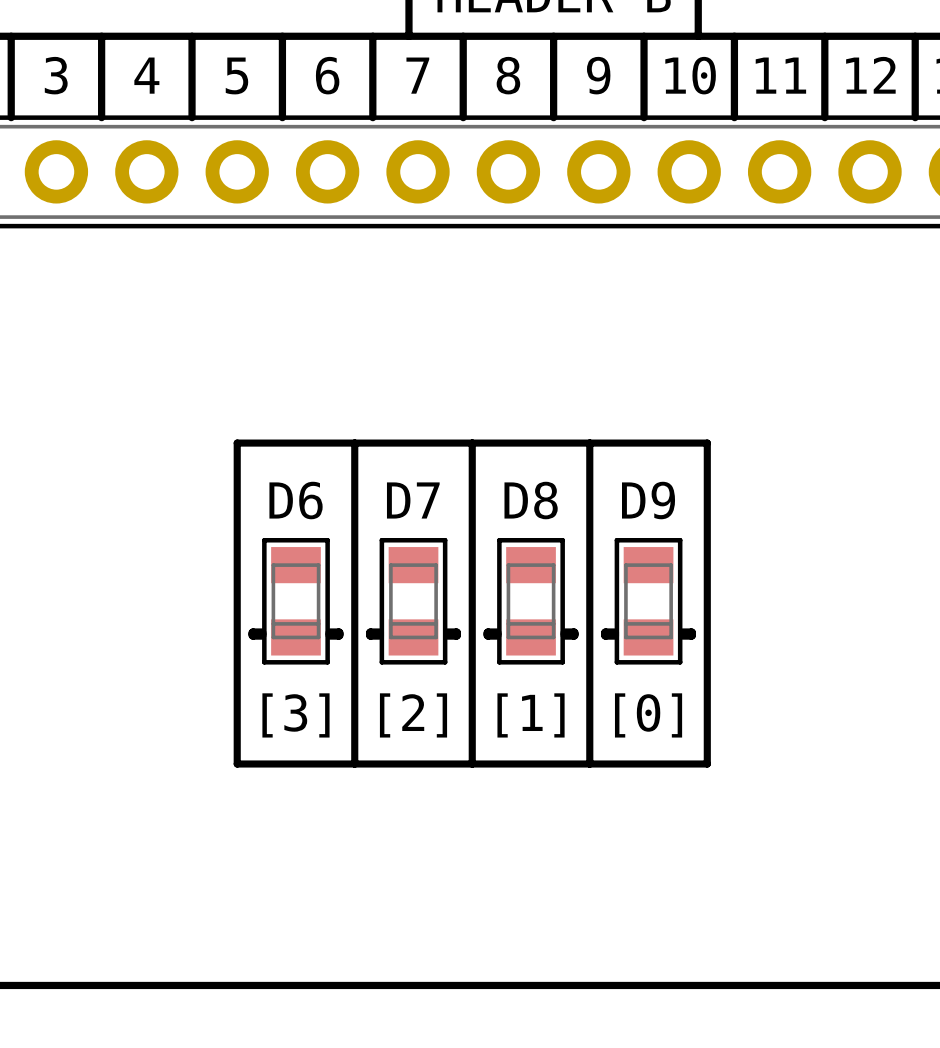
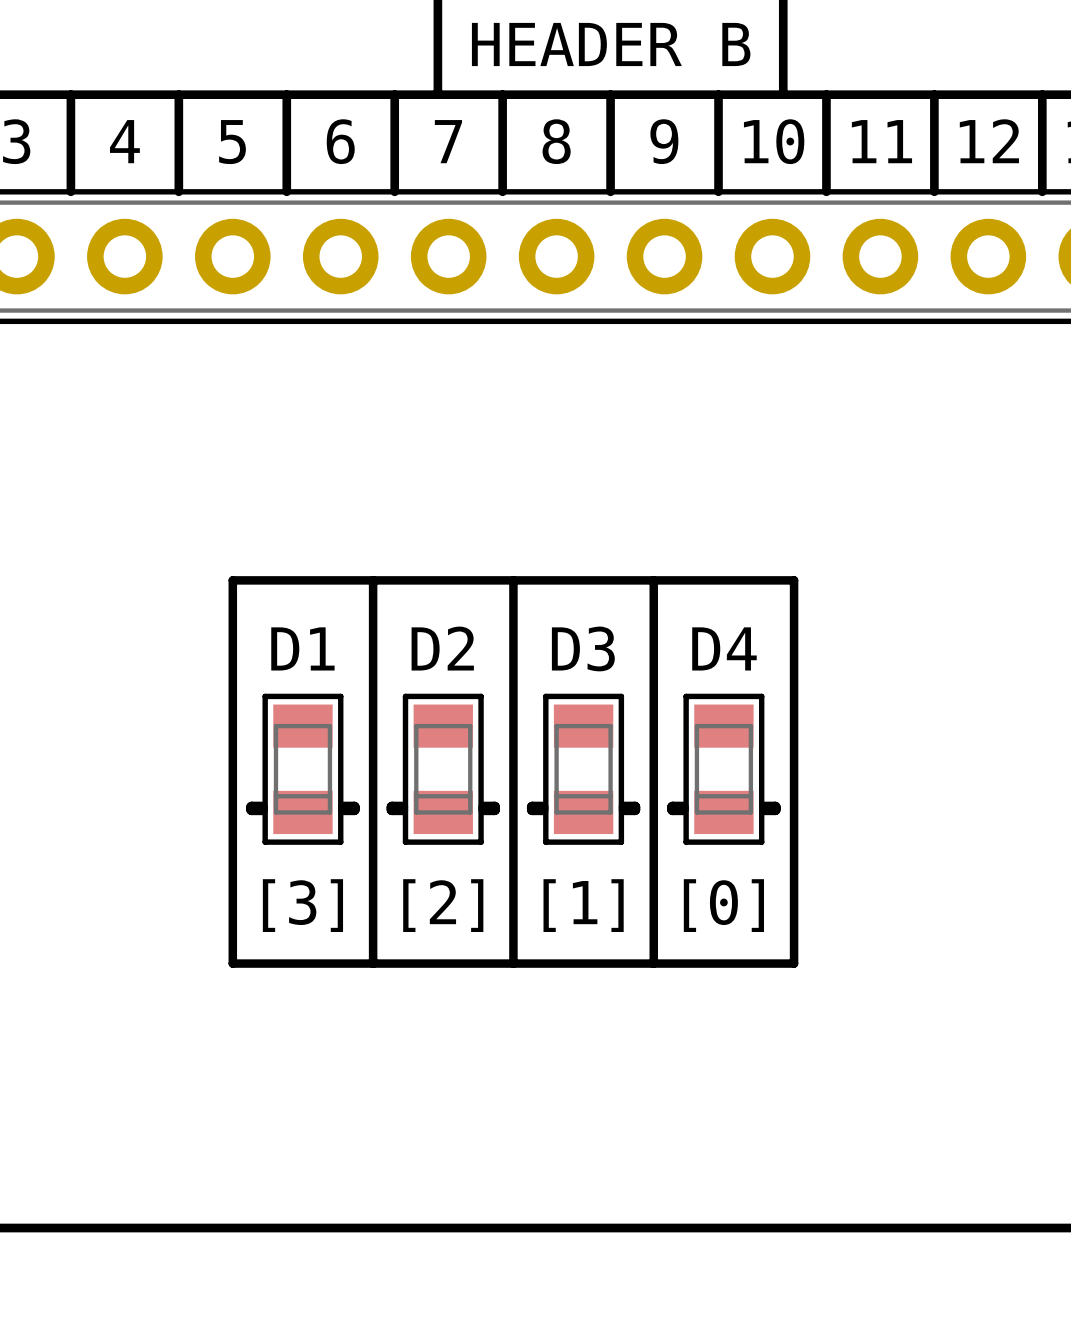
D6 name: D6 (296, 500) -> D1 (302, 648)
D7 name: D7 (413, 500) -> D2 (442, 648)
D8 name: D8 (531, 500) -> D3 (583, 648)
D9 name: D9 (648, 500) -> D4 (724, 648)

